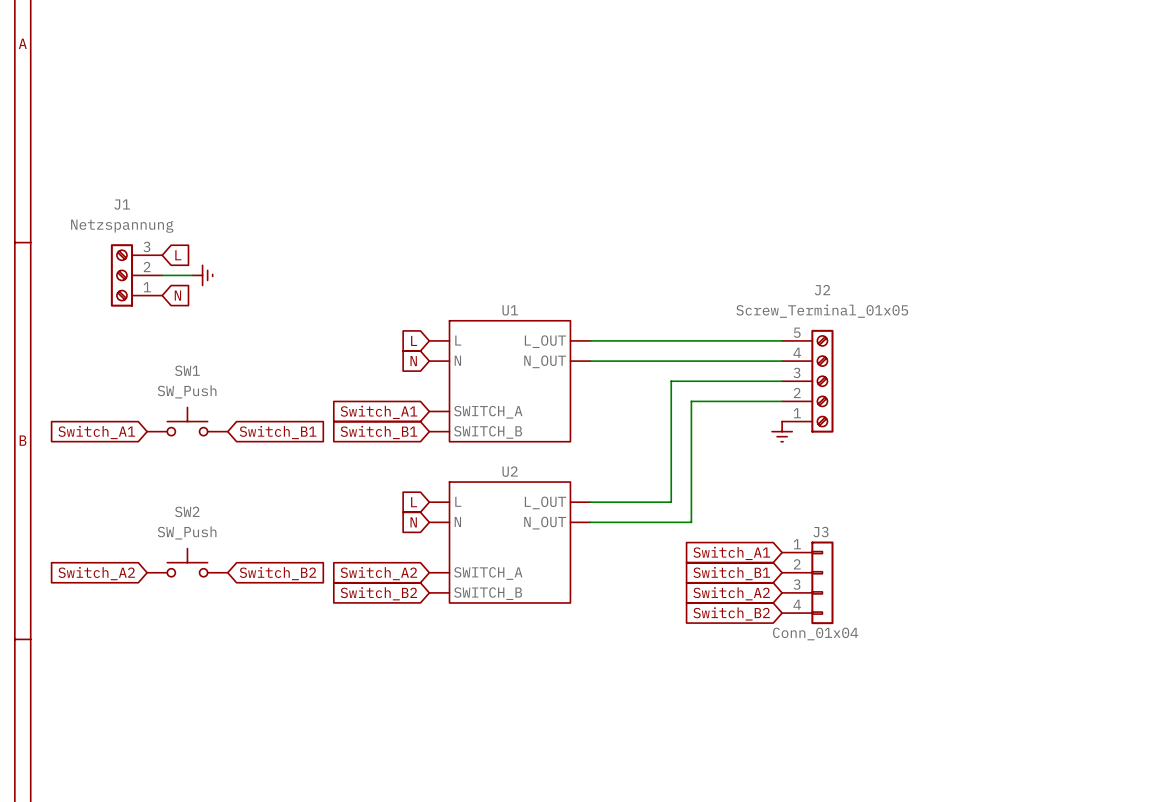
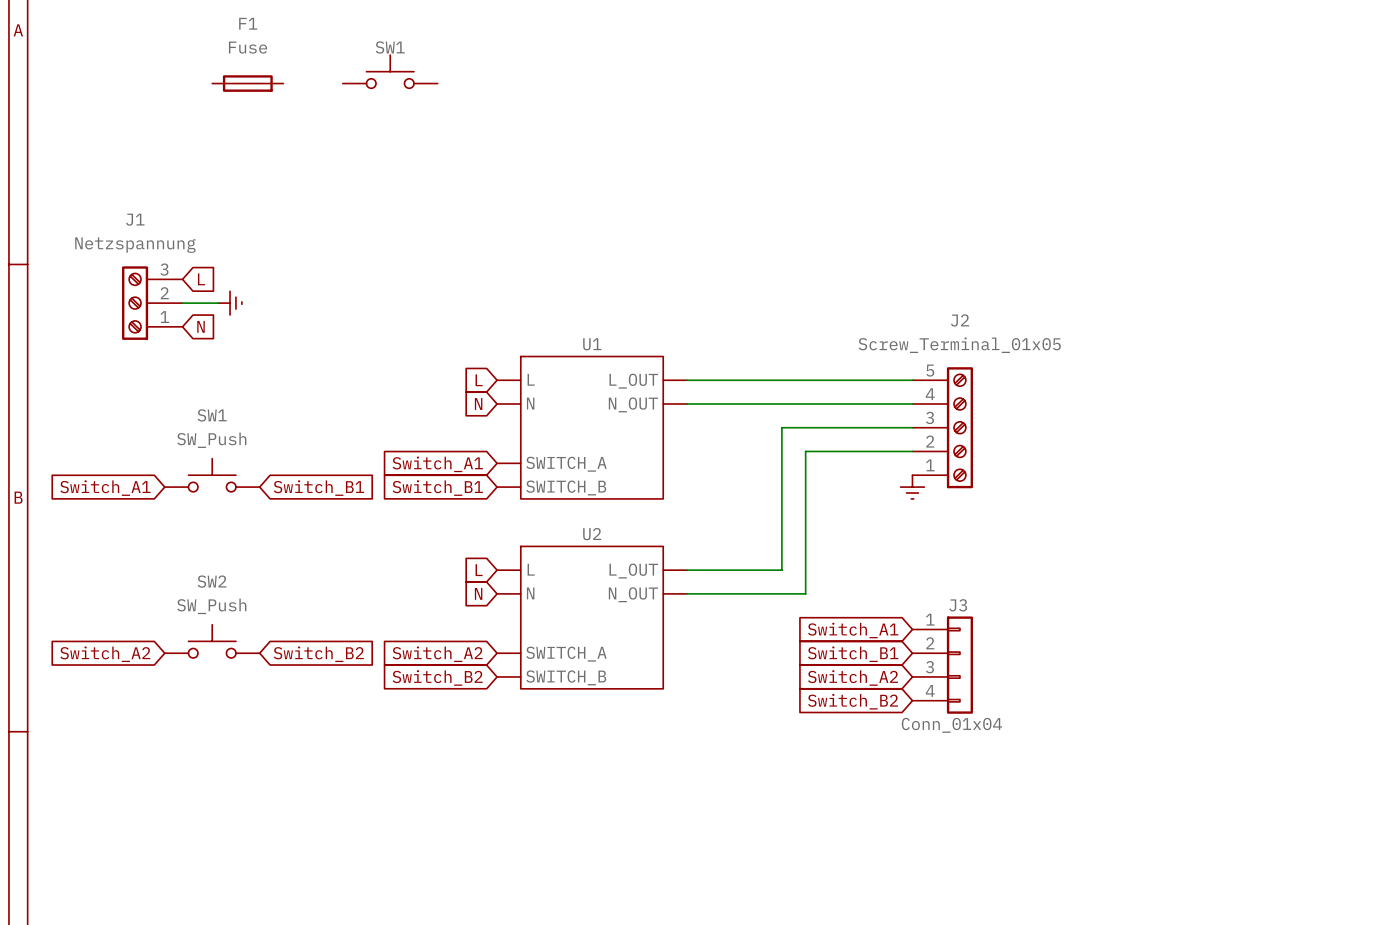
SW1: none -> (390, 71)
F1: none -> Fuse (247, 83)

